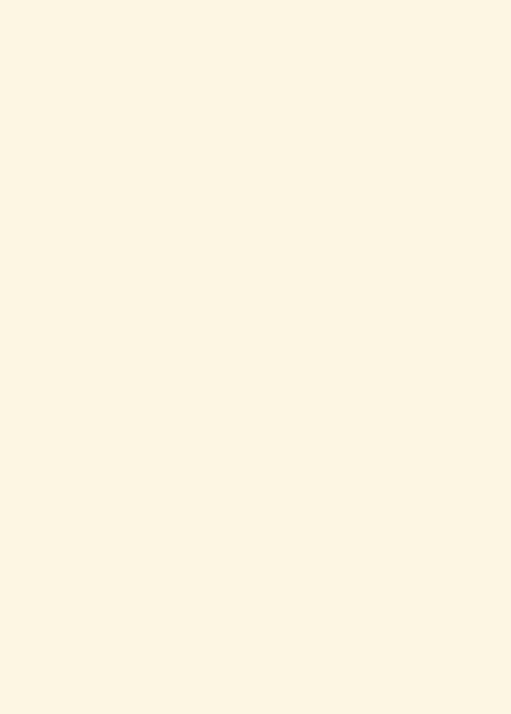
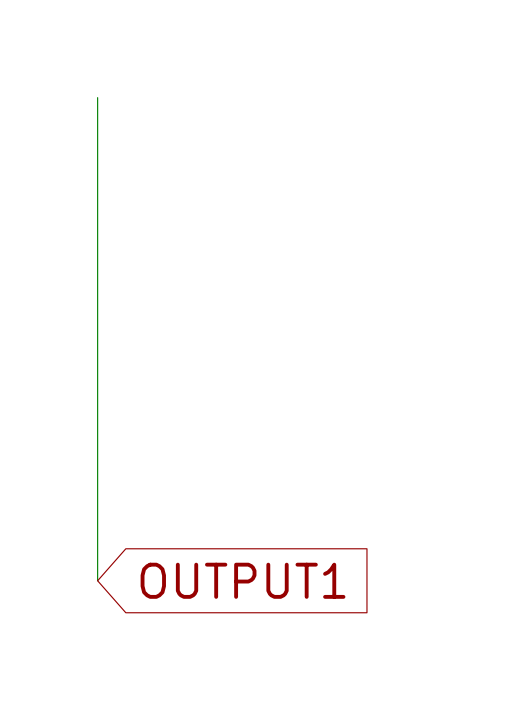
wire: none -> (97, 97) (97, 580)
global label: none -> OUTPUT1 (243, 580)

